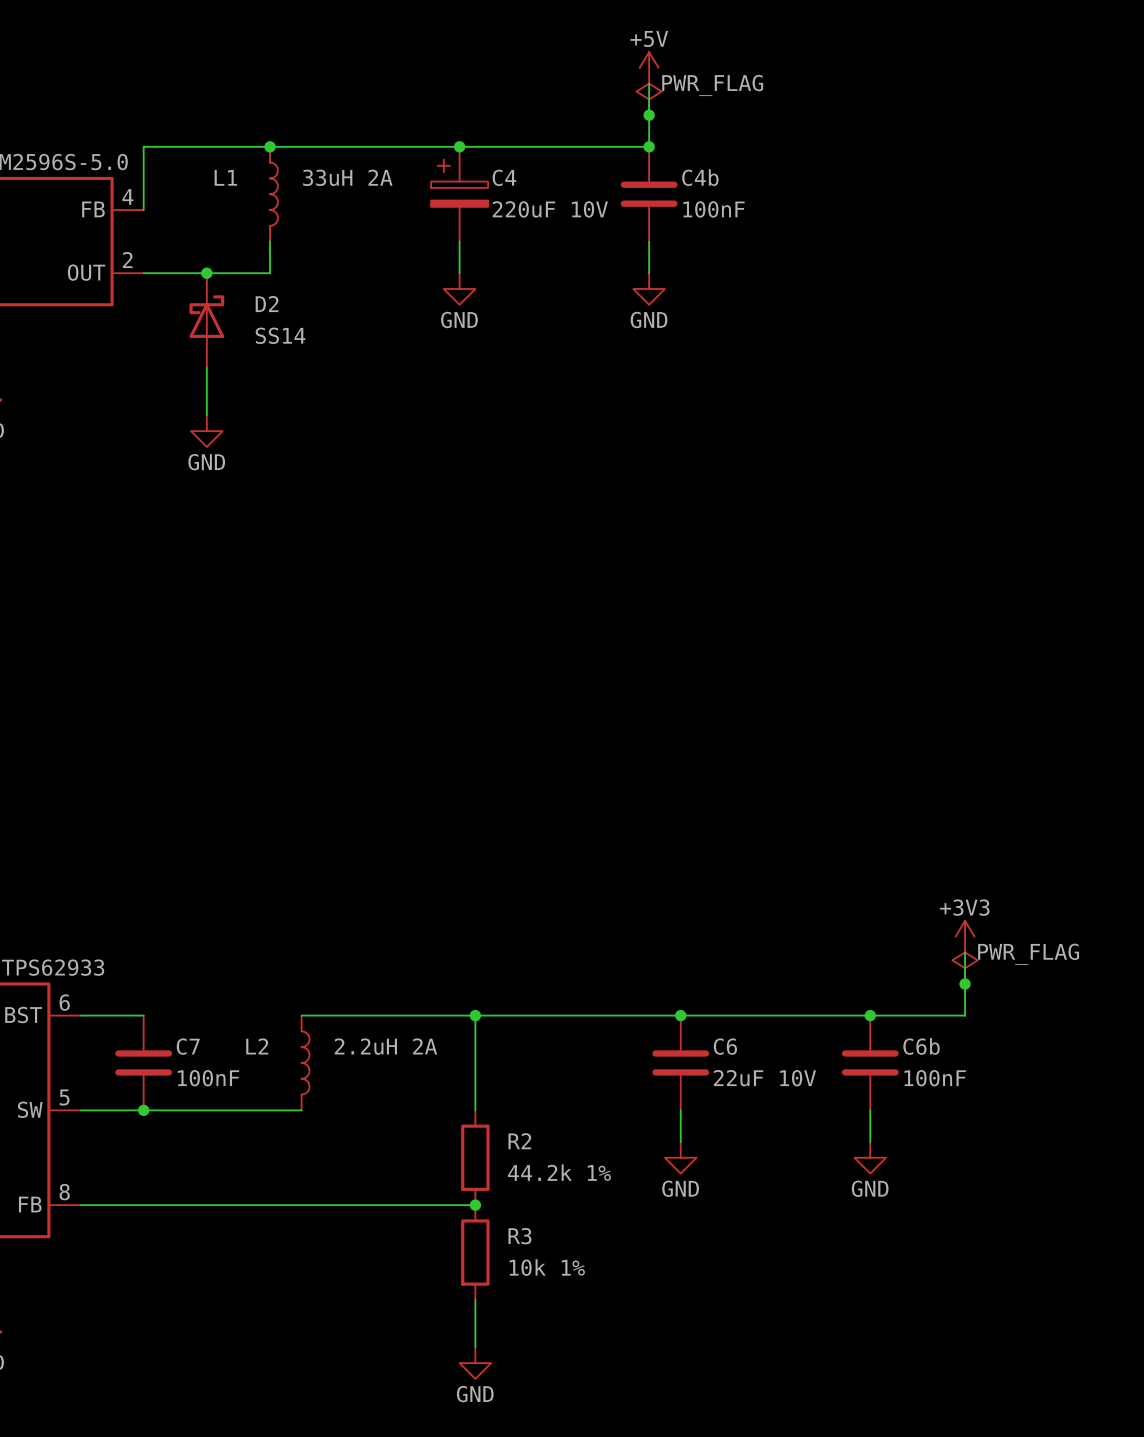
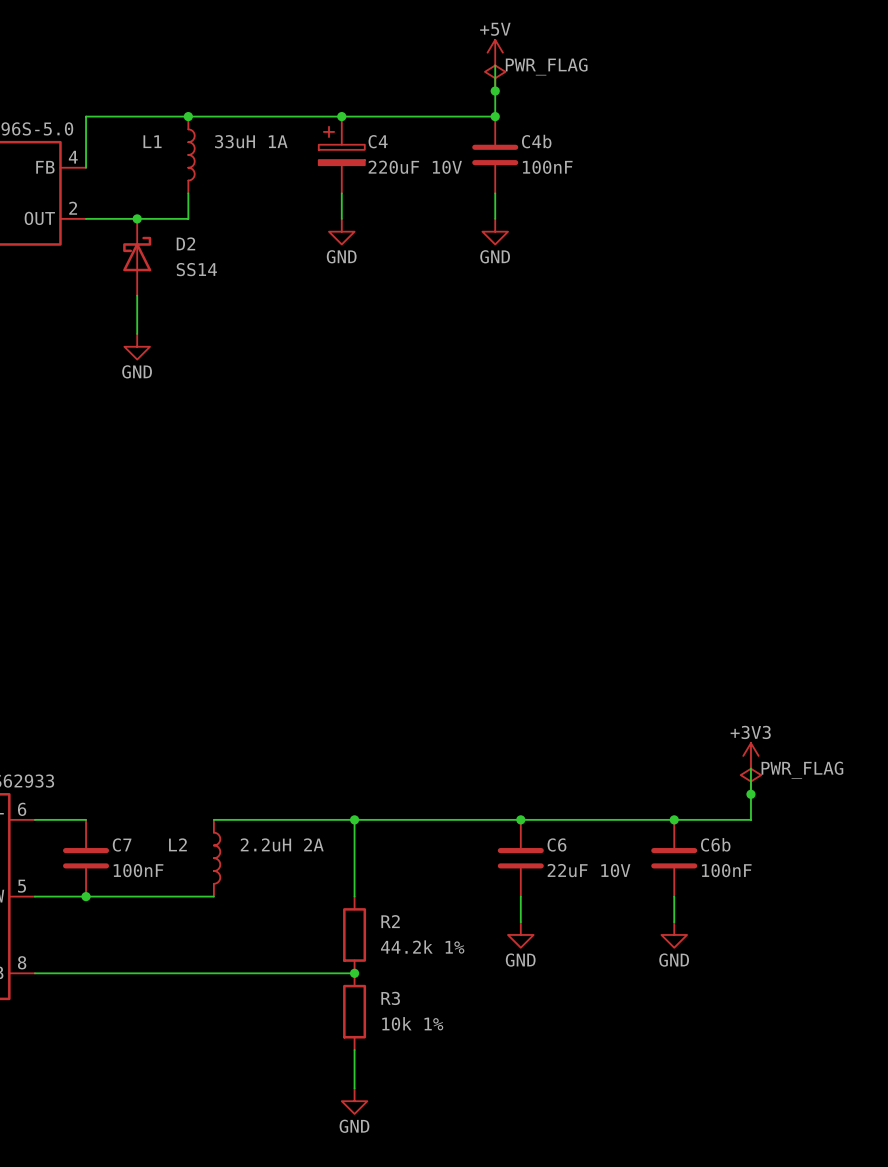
L1 value: 33uH 2A (347, 177) -> 33uH 1A (251, 141)

